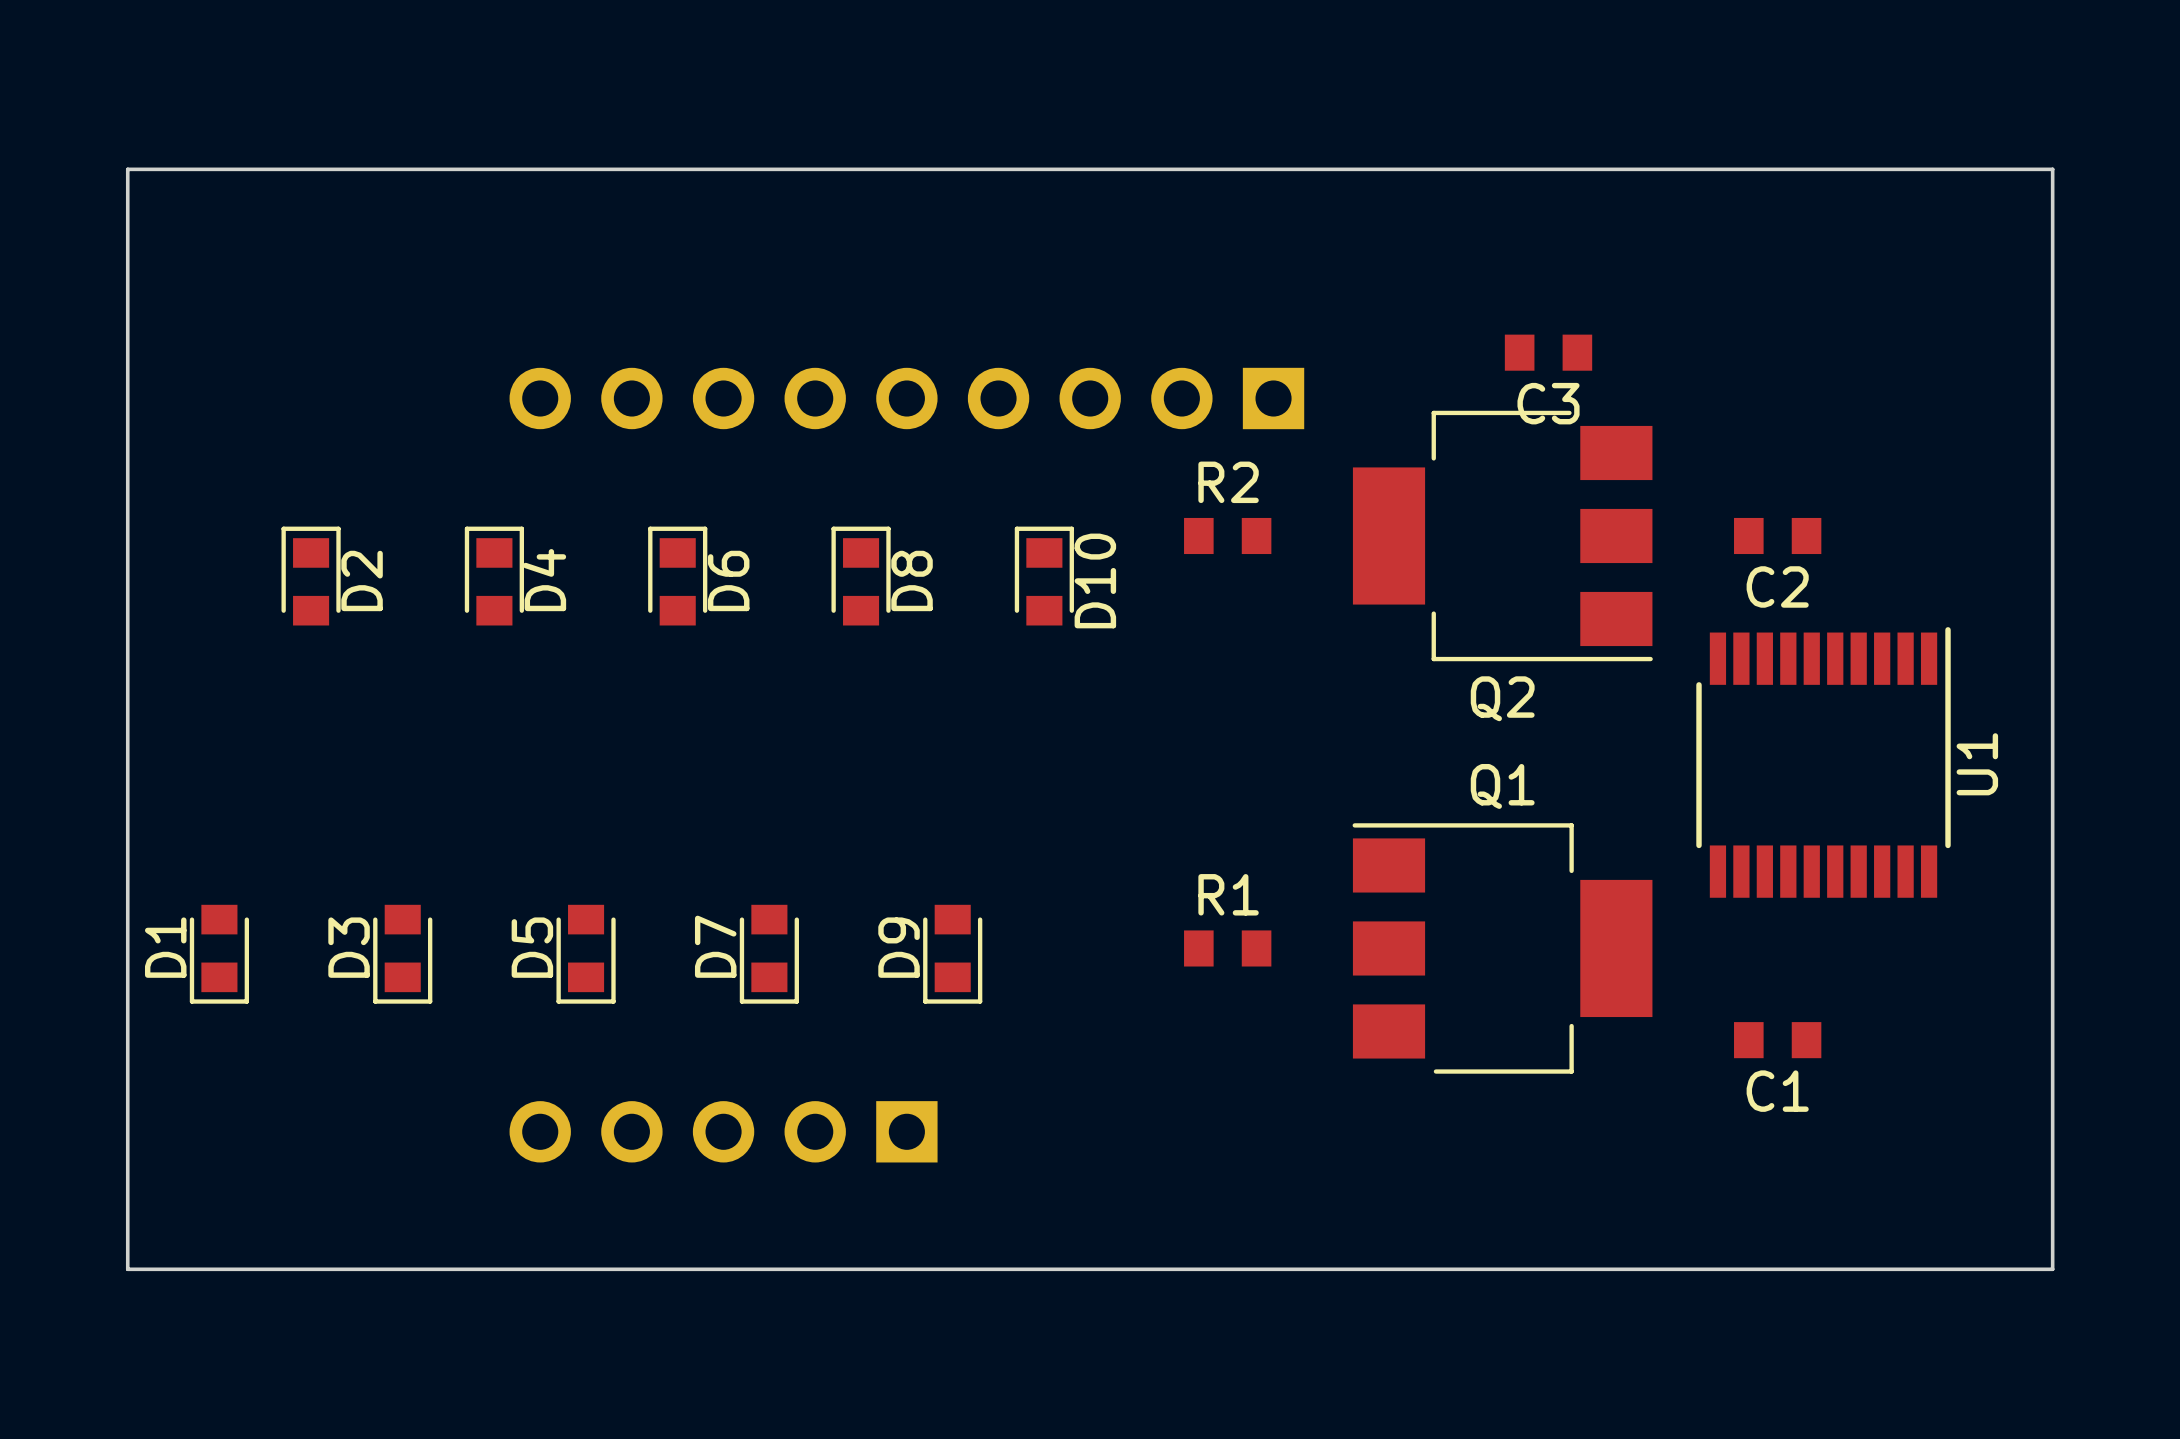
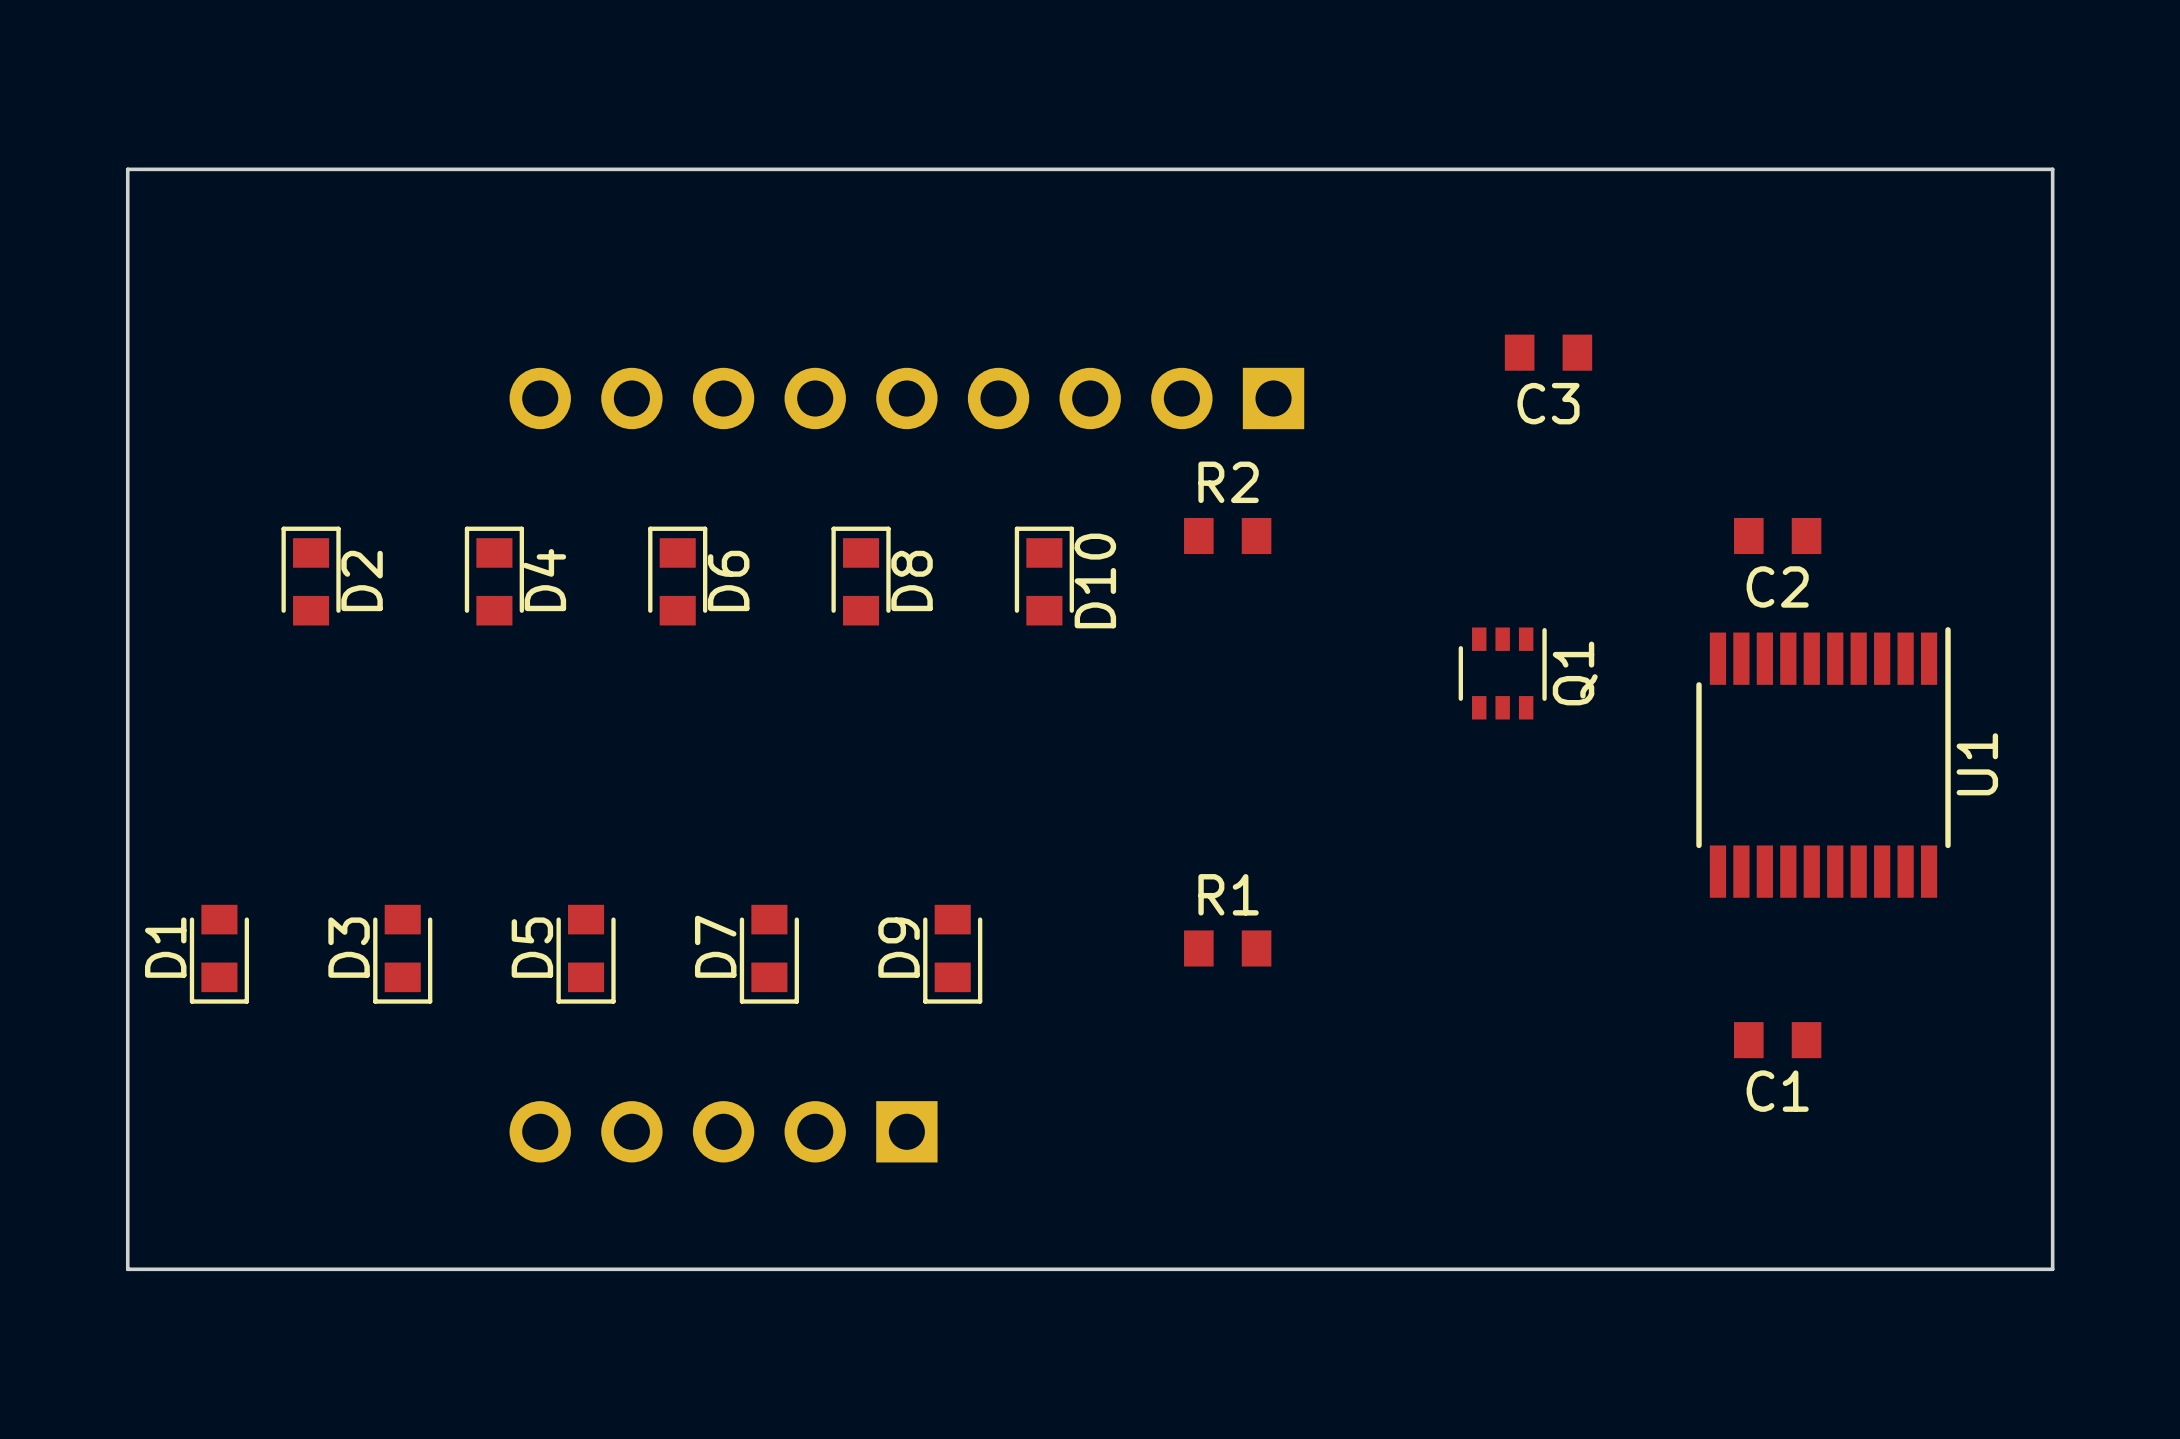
Q2: (1502, 535) -> none
Q1 name position: Q1 (1502, 786) -> Q1 (1575, 673)
Q1 footprint: [1352, 823, 1653, 1074] -> [1458, 627, 1547, 720]

